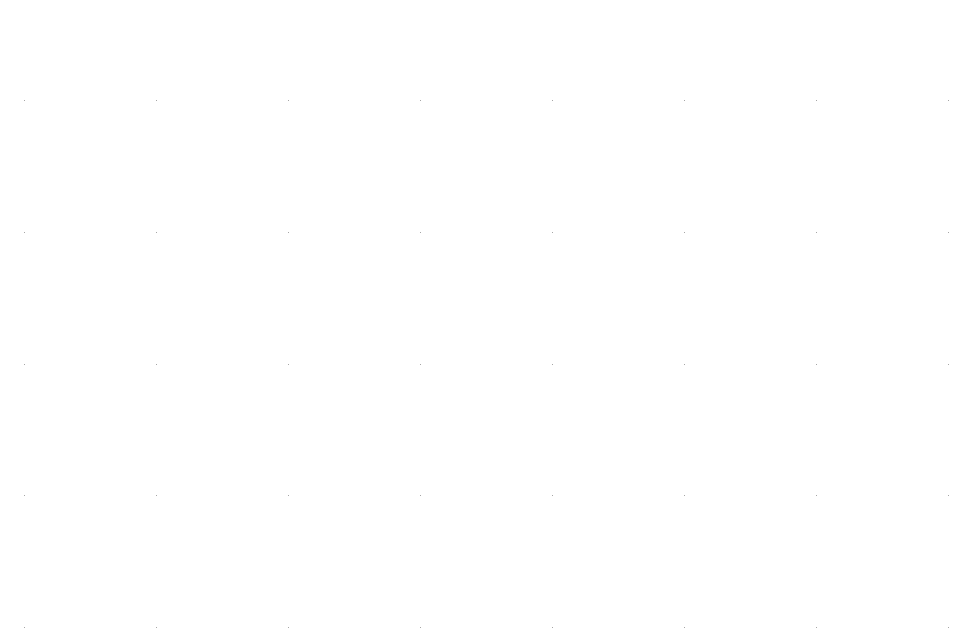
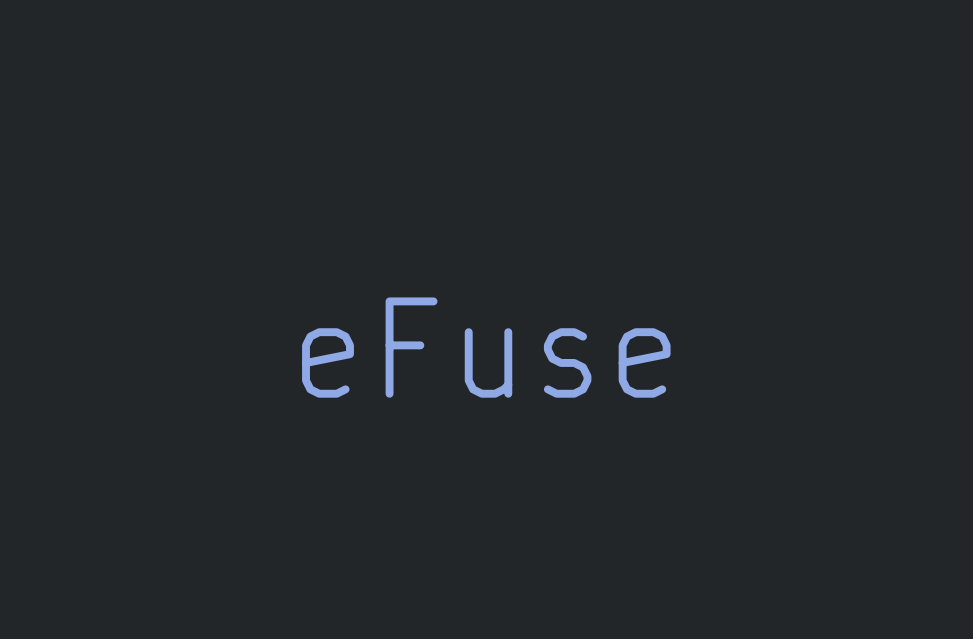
text: none -> eFuse (486, 347)

